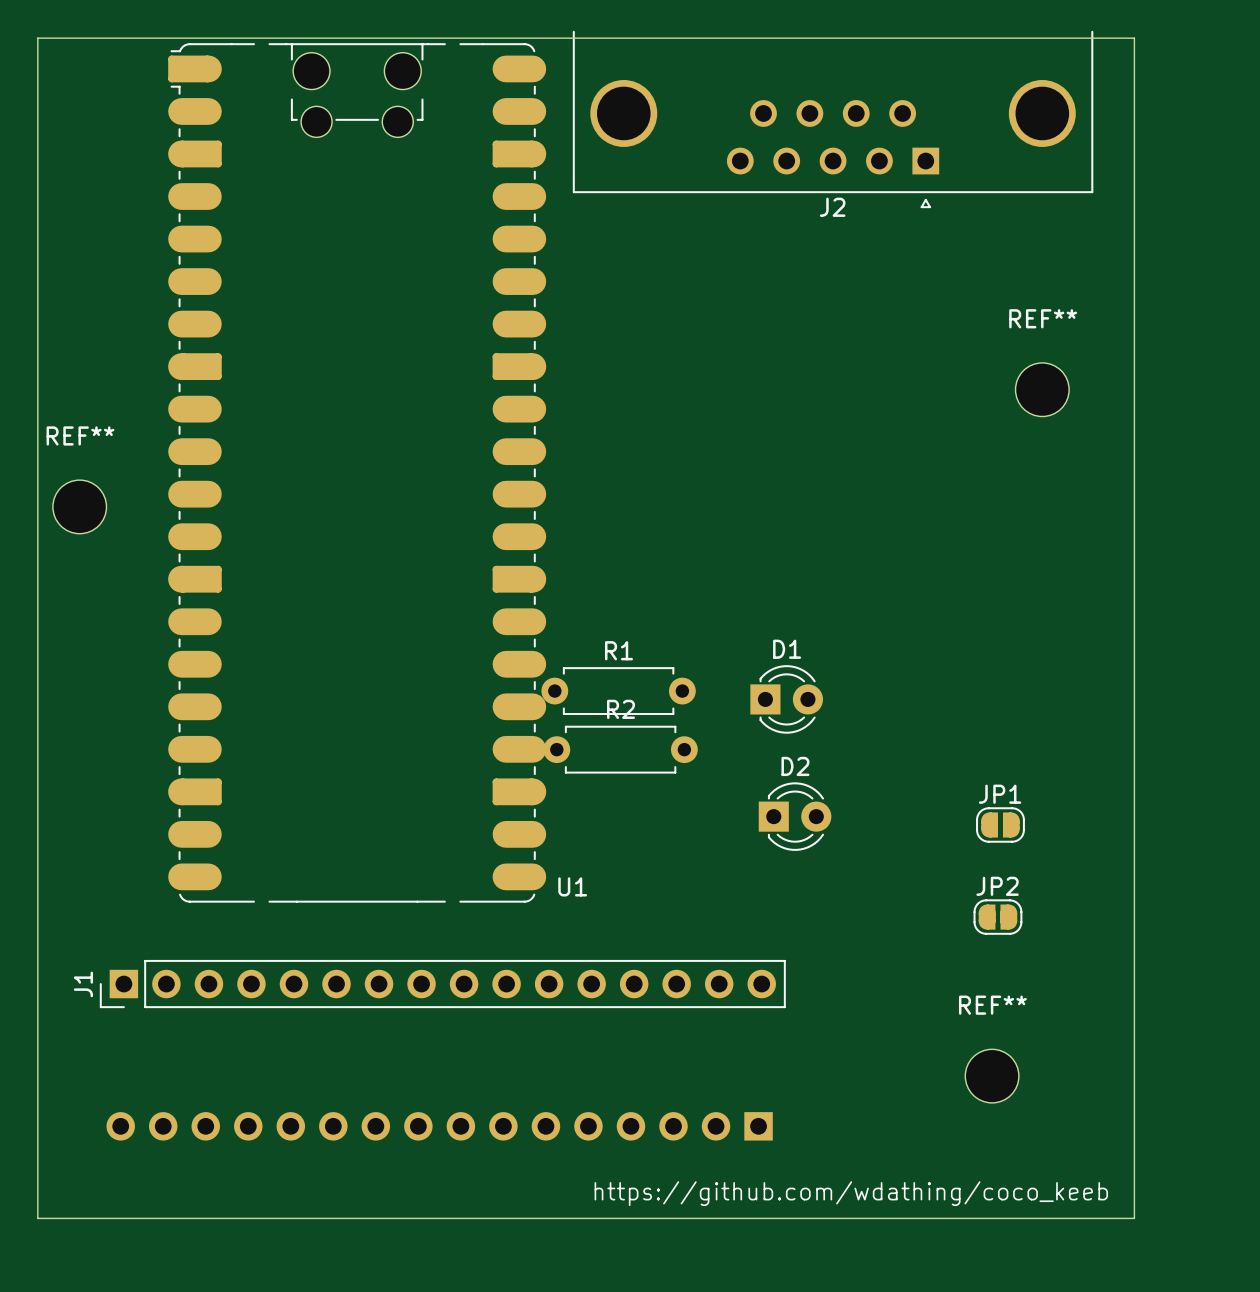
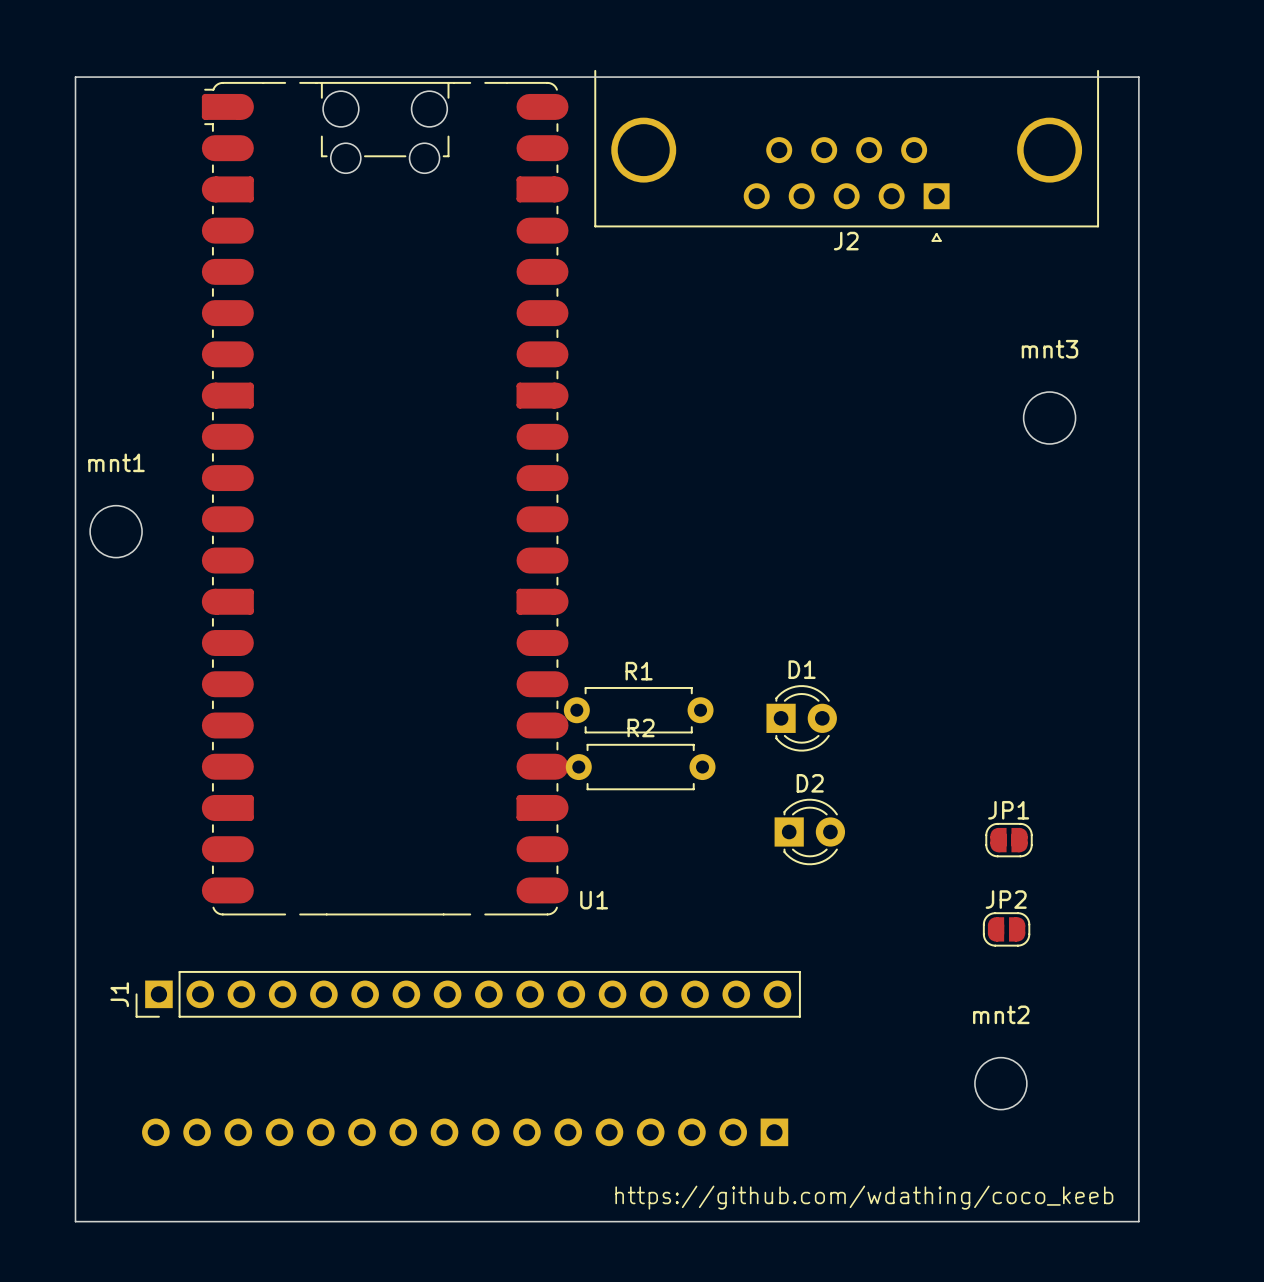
REF** name: REF** (1043, 318) -> mnt3 (1049, 349)
REF** name: REF** (80, 435) -> mnt1 (116, 462)
REF** name: REF** (992, 1005) -> mnt2 (1001, 1014)

